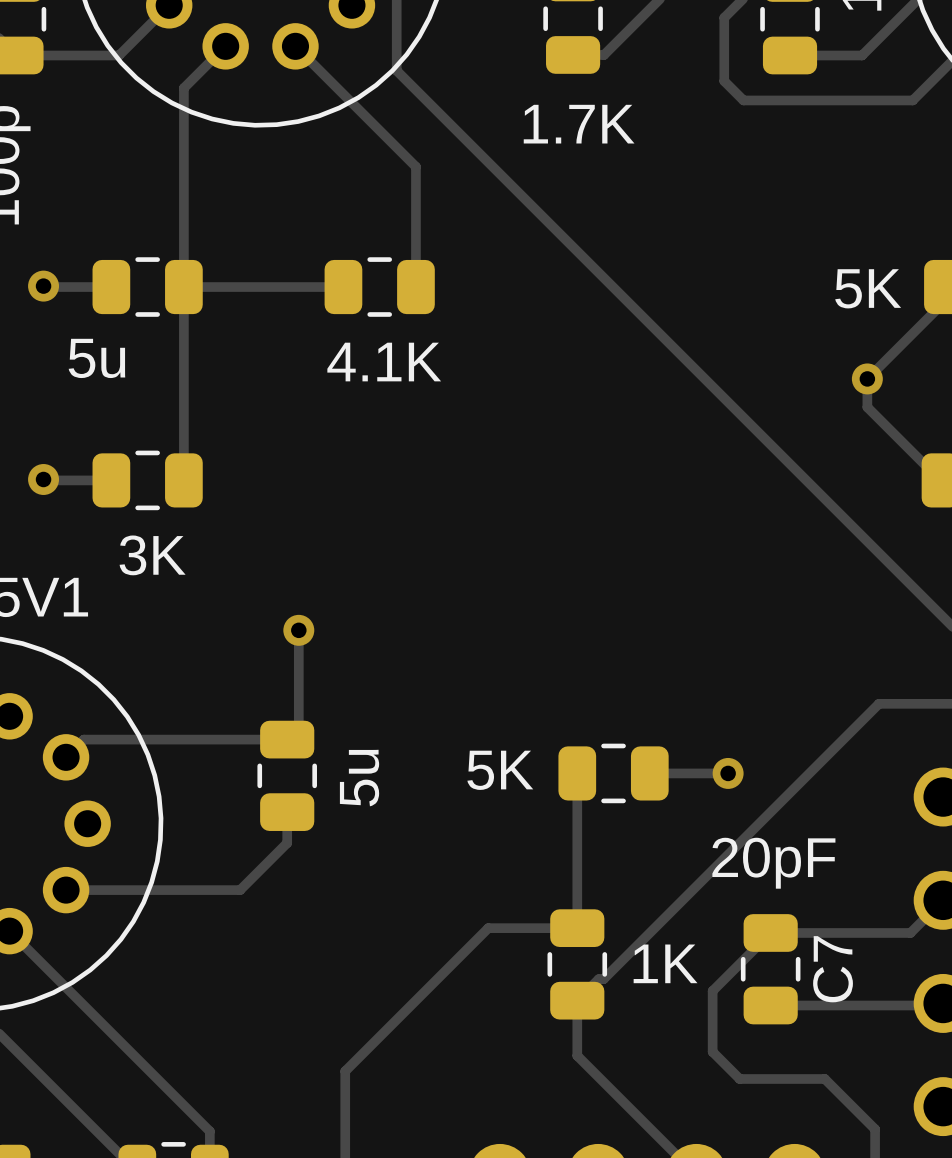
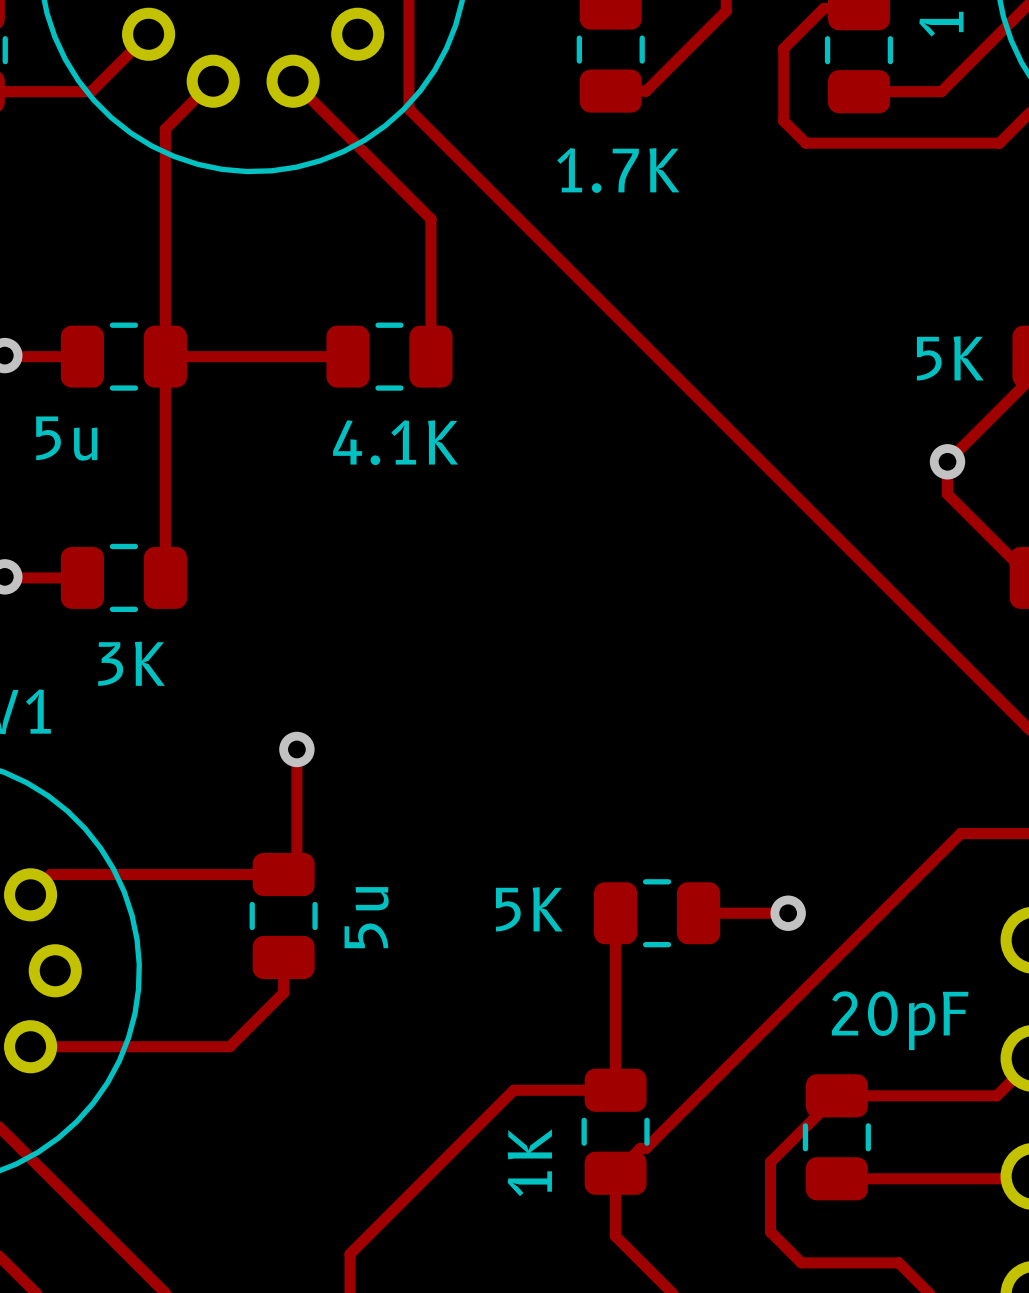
C7 value position: 20pF (773, 863) -> 20pF (900, 1020)
part value rotation: 0° (665, 963) -> 90° counterclockwise (529, 1162)
part value position: 1K (665, 963) -> 1K (529, 1162)
C7 name: C7 (833, 969) -> none

